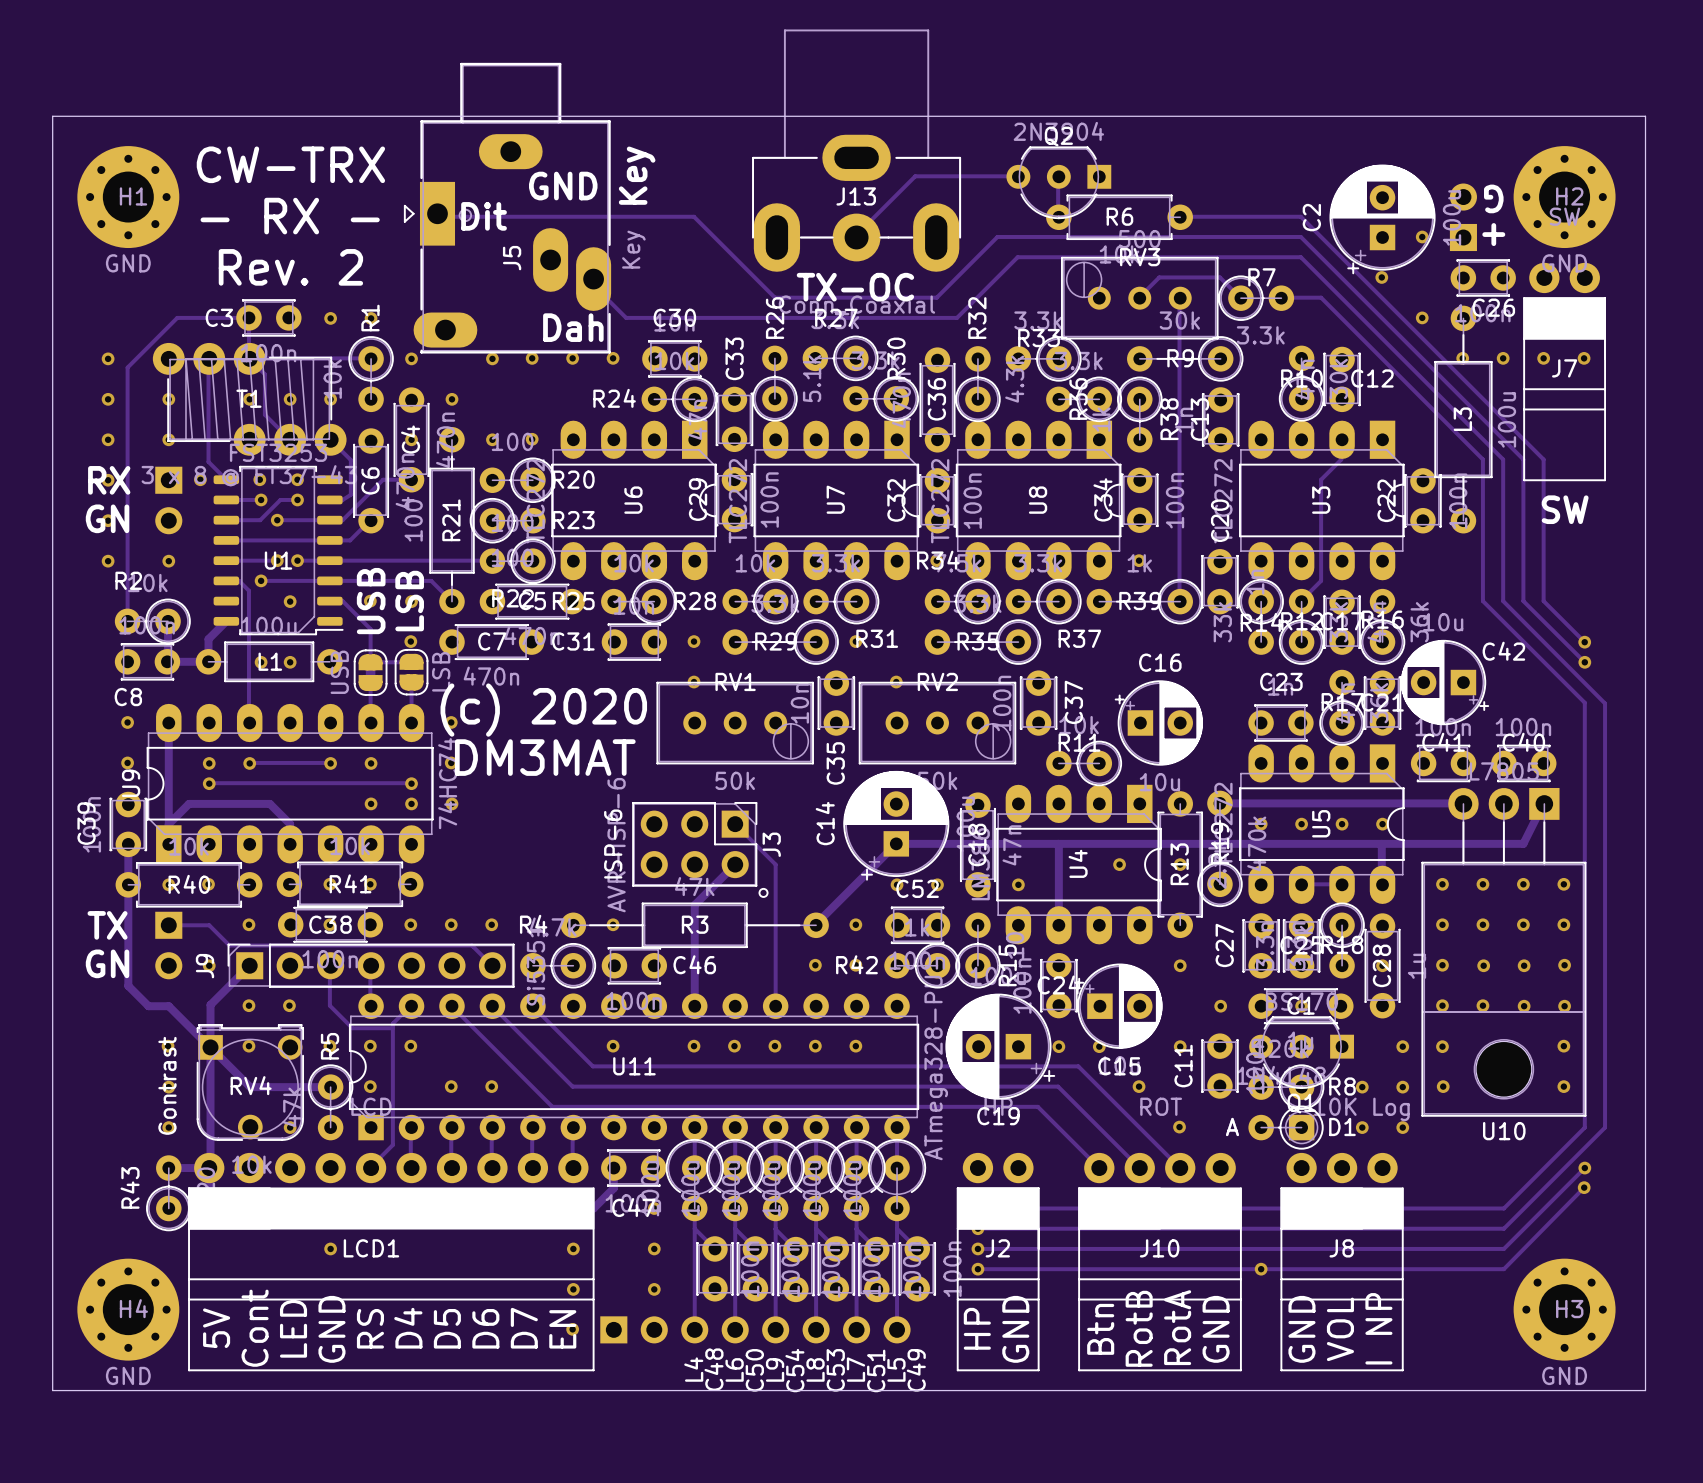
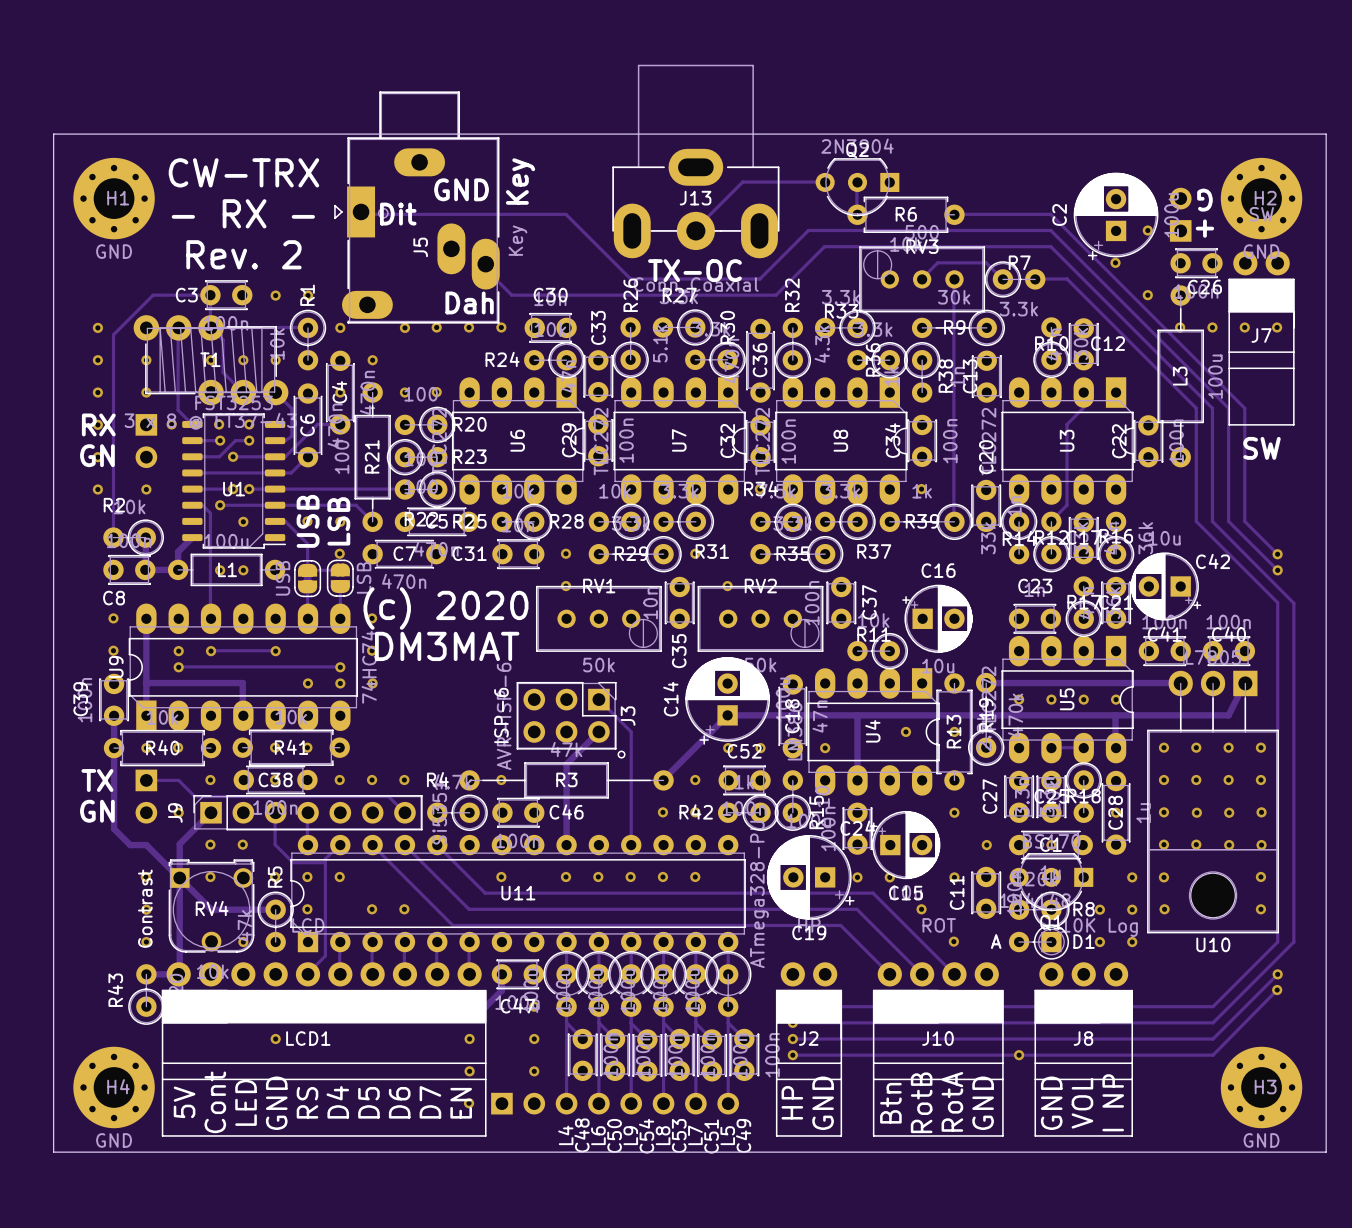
via: (371, 763) -> none
track: none -> (145, 683) (242, 683) (242, 710)
track: (168, 824) (189, 803) (269, 803) (290, 824) (290, 844) -> none

